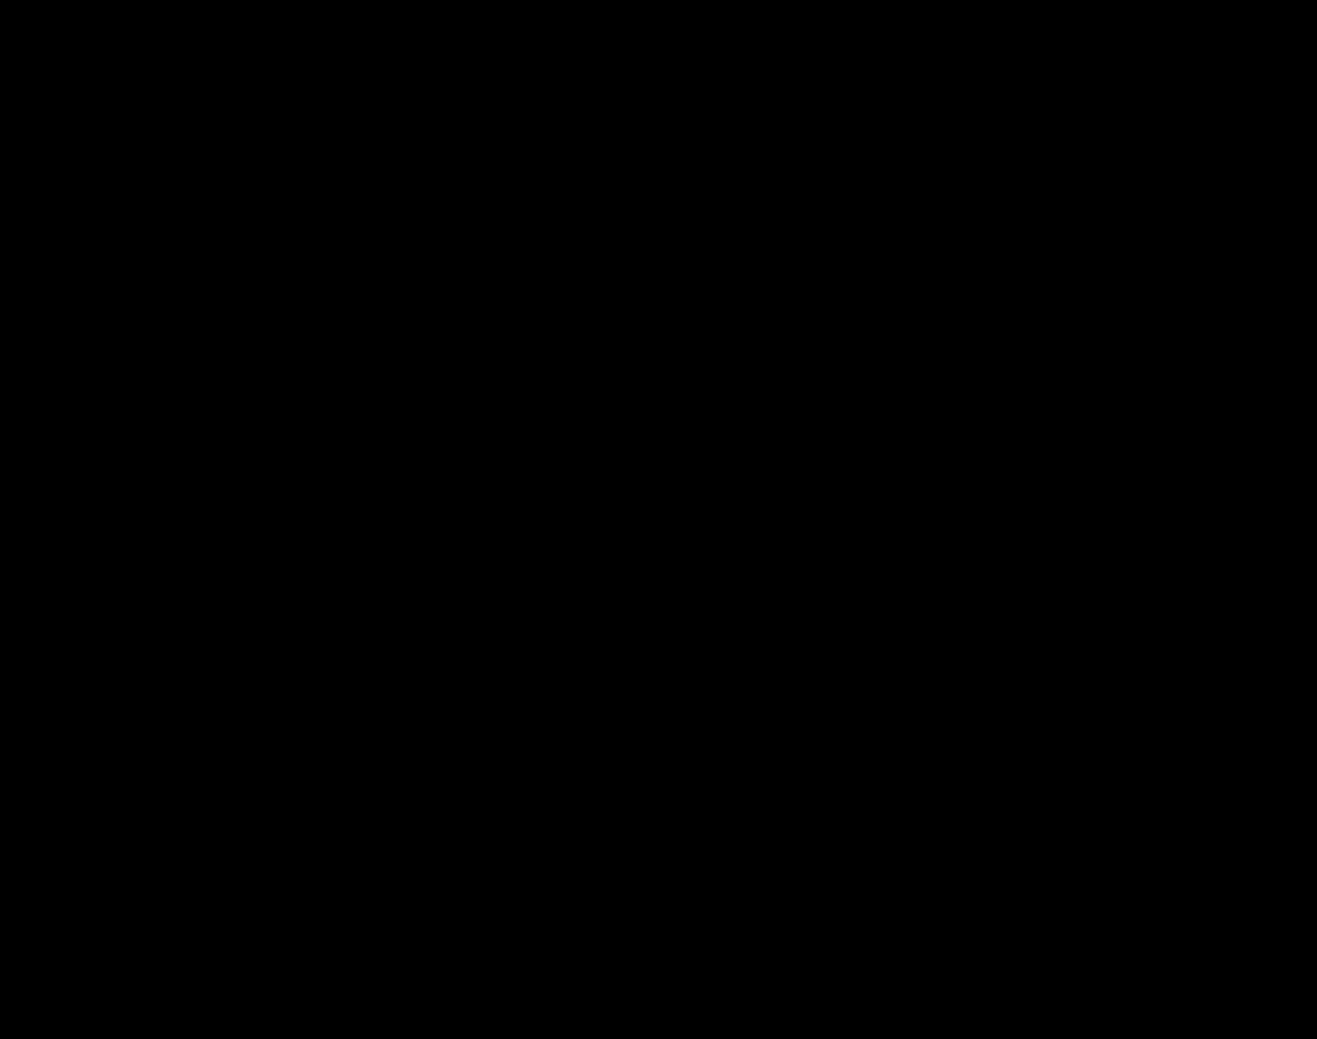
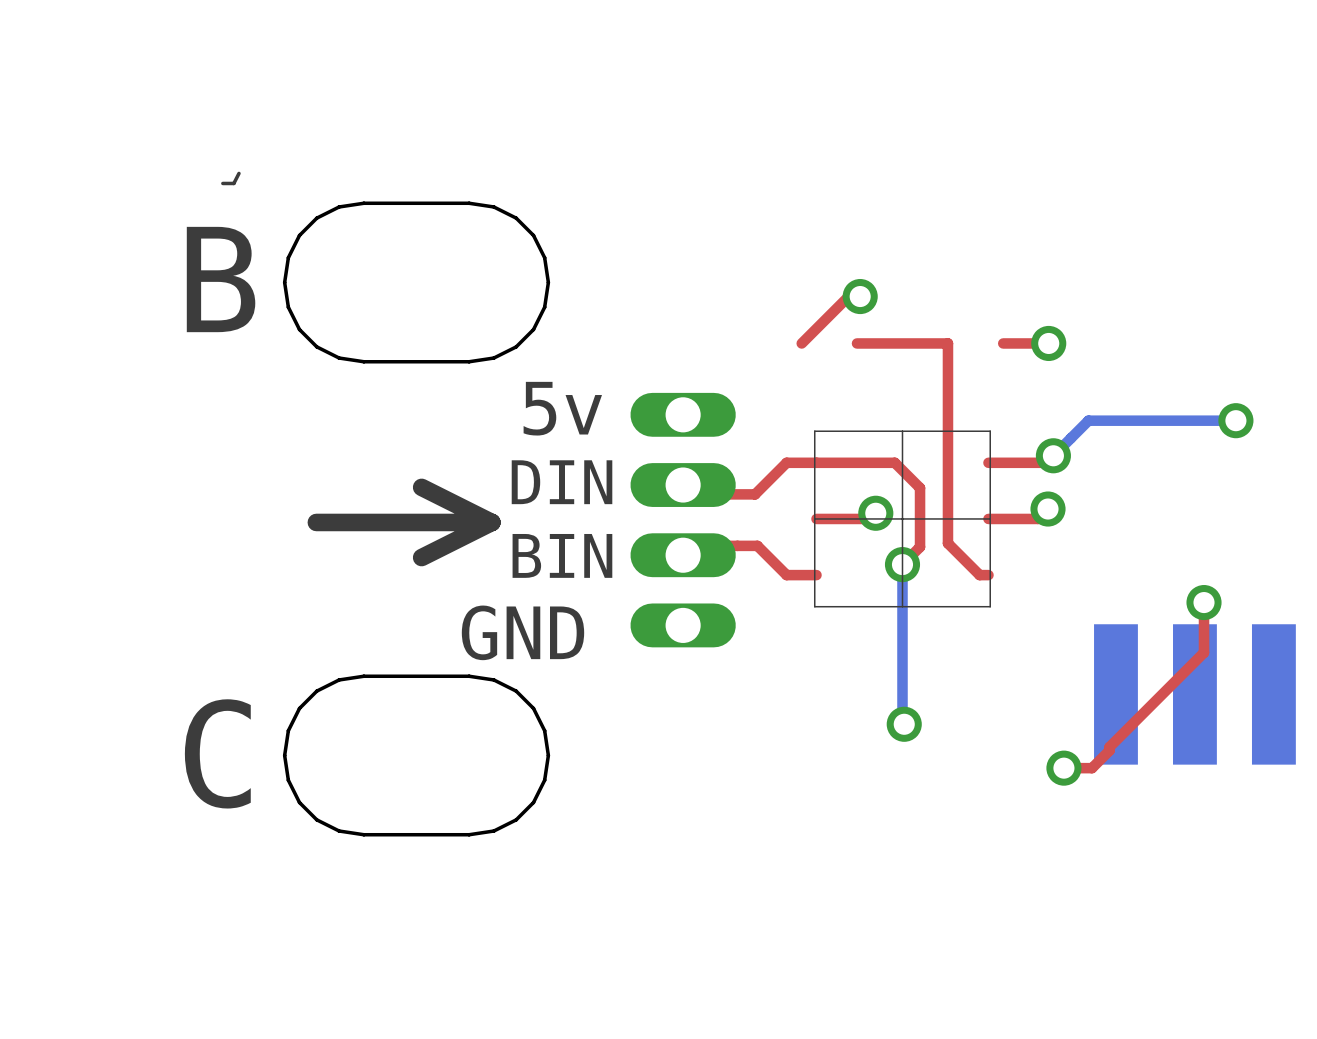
line: none -> (238, 173) (233, 183) (222, 183)
board edge: none -> (363, 203) (469, 203) (493, 206) (516, 218) (533, 235) (544, 257) (548, 282) (544, 307) (533, 329) (516, 346) (493, 358) (469, 361) (363, 361) (339, 358) (316, 346) (299, 329) (288, 307) (284, 282) (288, 257) (299, 235) (316, 218) (339, 206) (363, 203)
text: none -> B (221, 279)
top track: none -> (860, 296) (848, 296) (801, 343)
via: none -> (860, 296)
top track: none -> (857, 343) (947, 343) (947, 543) (979, 575) (988, 575)
top track: none -> (1003, 343) (1048, 343)
via: none -> (1048, 343)
text: none -> 5v (562, 408)
bottom track: none -> (1235, 420) (1088, 420) (1053, 455)
via: none -> (1235, 420)
line: none -> (814, 431) (990, 431) (990, 606) (814, 606) (814, 431)
line: none -> (902, 431) (902, 606)
top track: none -> (1053, 455) (1046, 462) (988, 462)
via: none -> (1053, 455)
text: none -> DIN (562, 482)
line: none -> (421, 487) (491, 522)
top track: none -> (683, 494) (755, 494) (786, 462) (894, 462) (920, 488) (920, 547) (902, 564)
top track: none -> (1048, 509) (1038, 518) (988, 518)
via: none -> (1048, 509)
top track: none -> (875, 513) (870, 518) (816, 518)
via: none -> (875, 513)
line: none -> (814, 518) (990, 518)
part: none -> (683, 520)
line: none -> (316, 522) (491, 522)
line: none -> (491, 522) (421, 557)
top track: none -> (683, 545) (757, 545) (786, 575) (816, 575)
text: none -> BIN (562, 555)
bottom track: none -> (902, 564) (902, 722) (904, 724)
via: none -> (902, 564)
top track: none -> (1204, 602) (1204, 652) (1109, 747) (1109, 750) (1092, 768) (1063, 768)
via: none -> (1204, 602)
text: none -> GND (522, 632)
board edge: none -> (363, 676) (469, 676) (493, 679) (516, 691) (533, 708) (544, 730) (548, 755) (544, 780) (533, 802) (516, 819) (493, 831) (469, 834) (363, 834) (339, 831) (316, 819) (299, 802) (288, 780) (284, 755) (288, 730) (299, 708) (316, 691) (339, 679) (363, 676)
part: none -> (1194, 694)
via: none -> (904, 724)
text: none -> C (217, 753)
via: none -> (1063, 768)

